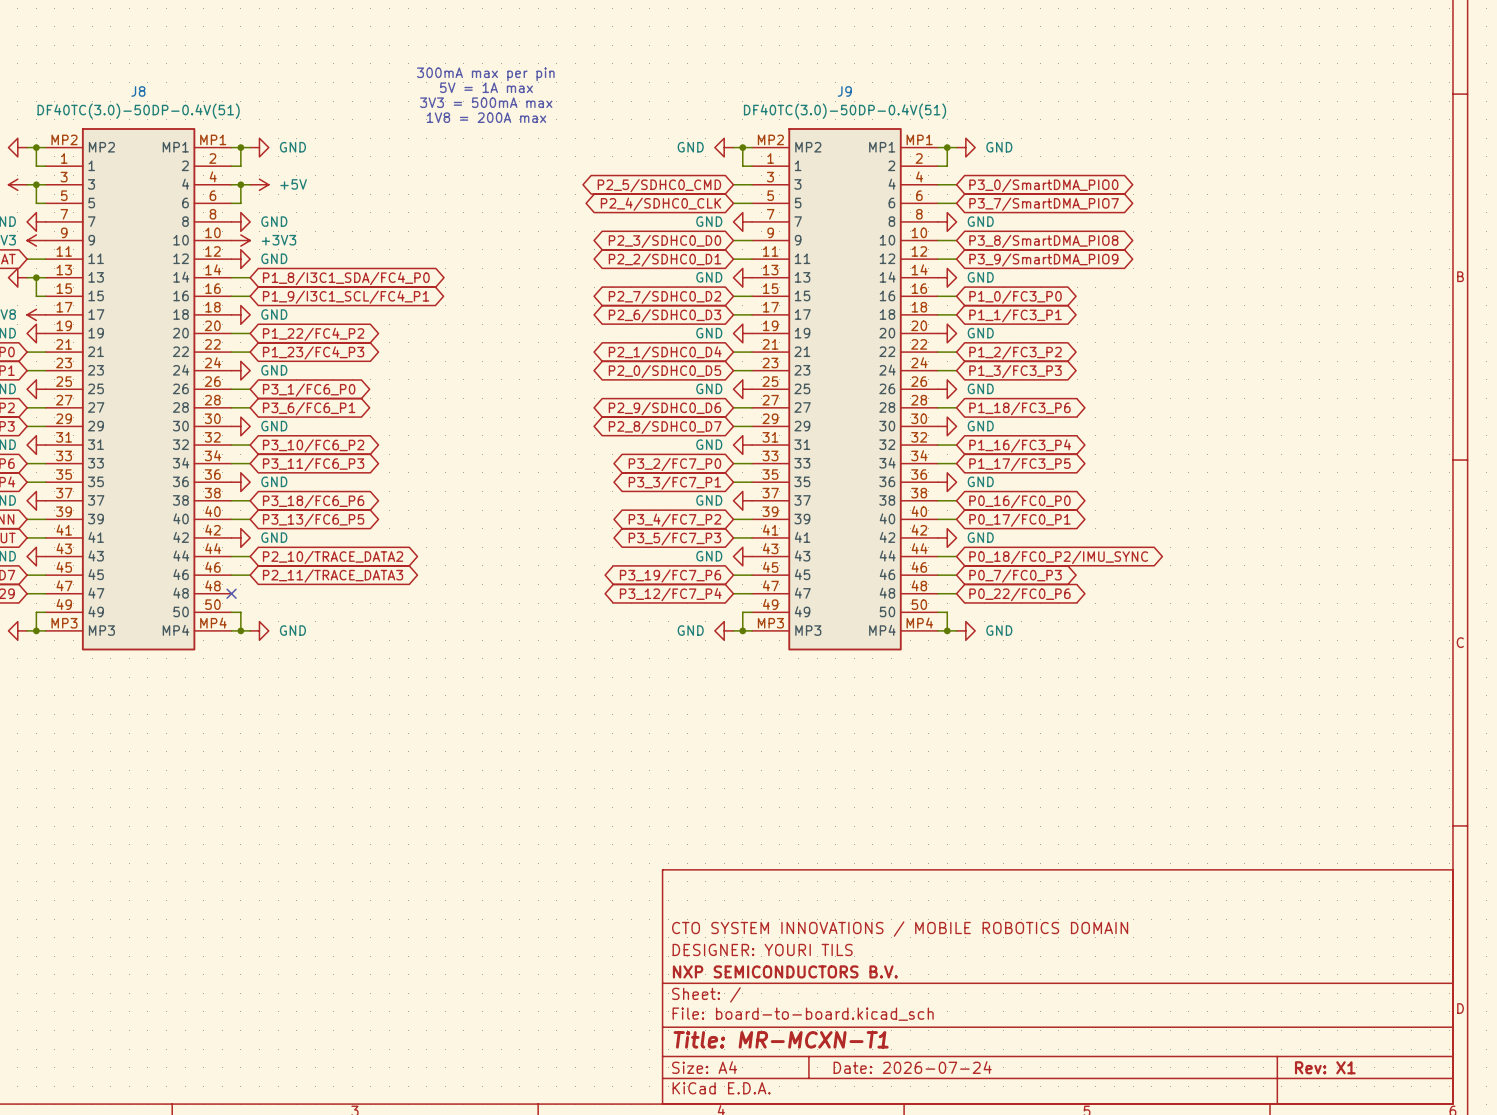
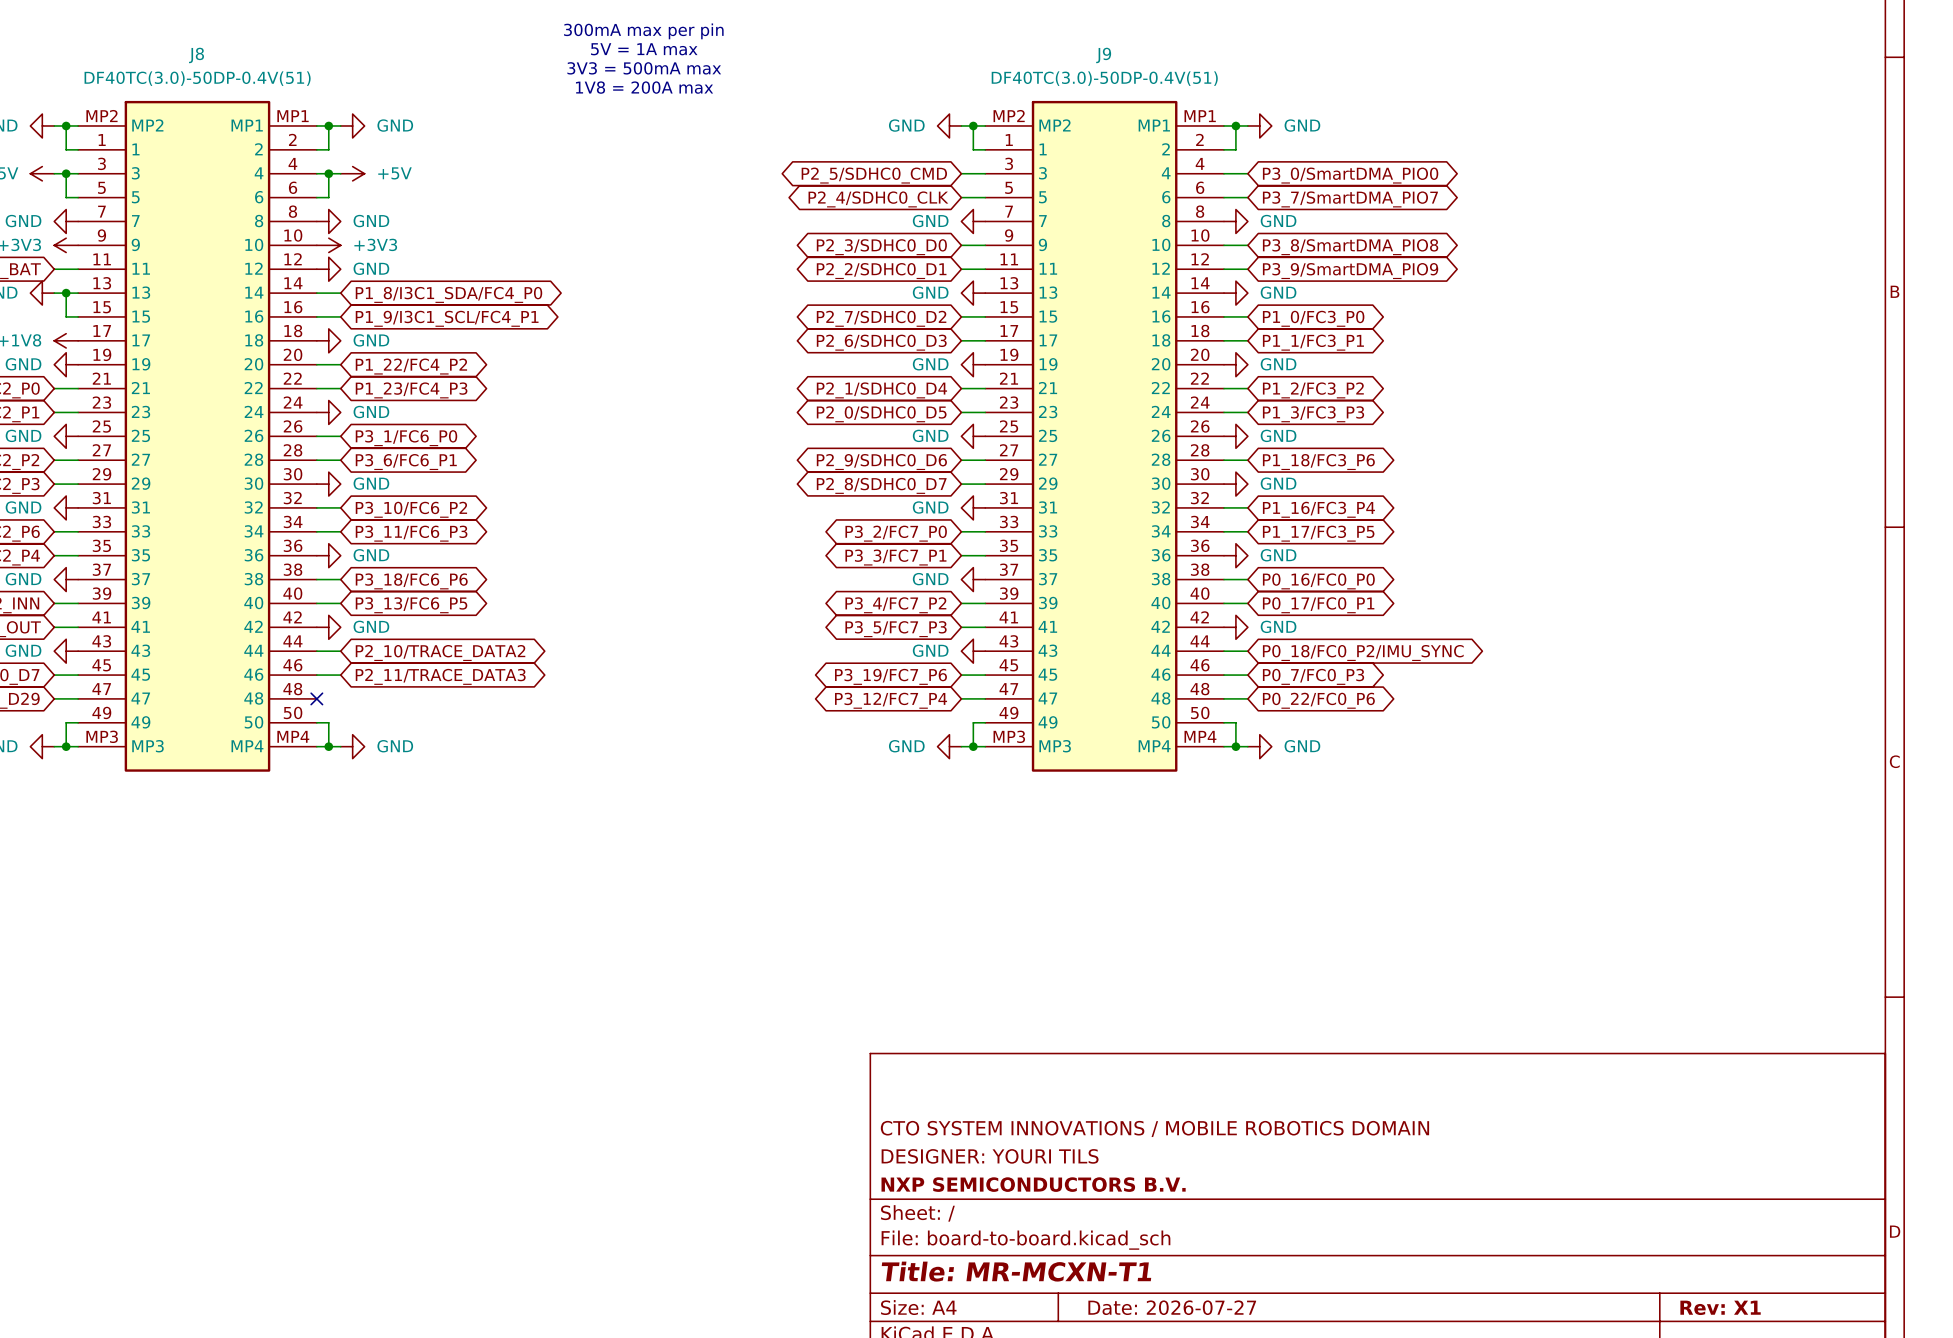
title block: Date: 2026-07-24 (912, 1067) -> Date: 2026-07-27 (1172, 1307)

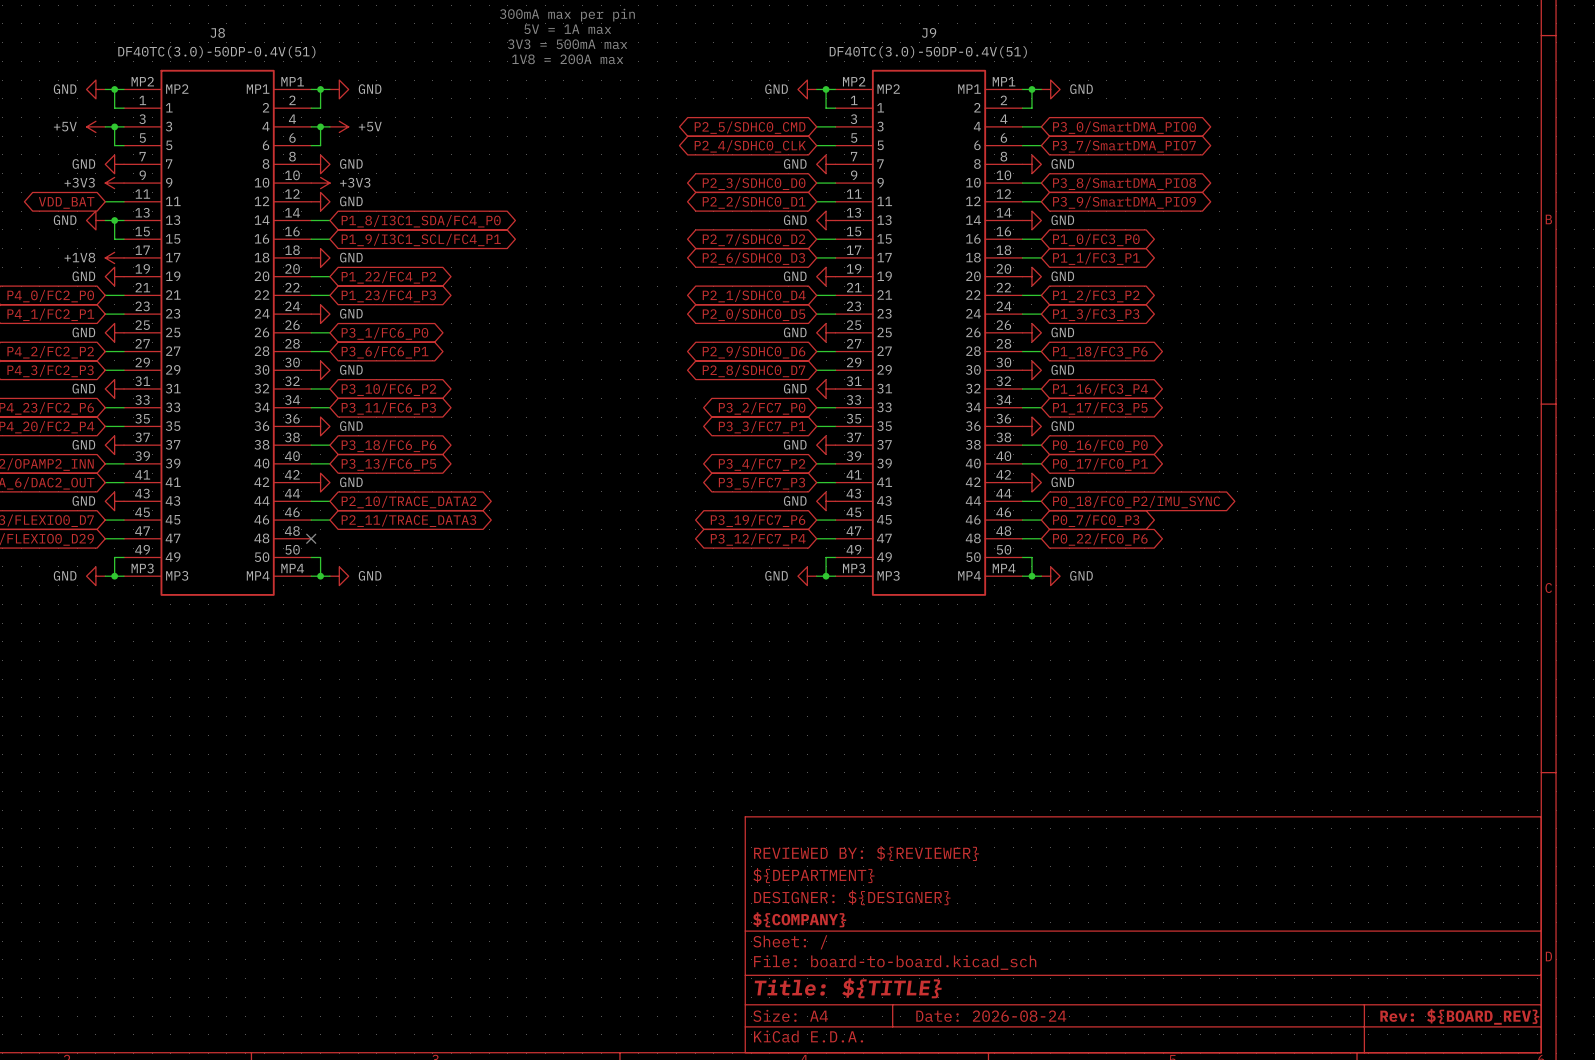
title block: none -> REVIEWED BY: ${REVIEWER} (866, 853)
title block: CTO SYSTEM INNOVATIONS / MOBILE ROBOTICS DOMAIN (1154, 1128) -> ${DEPARTMENT} (813, 875)
title block: DESIGNER: YOURI TILS (990, 1156) -> DESIGNER: ${DESIGNER} (852, 897)
title block: NXP SEMICONDUCTORS B.V. (1033, 1184) -> ${COMPANY} (799, 919)
title block: Title: MR-MCXN-T1 (1016, 1271) -> Title: ${TITLE} (848, 988)
title block: Date: 2026-07-27 (1172, 1307) -> Date: 2026-08-24 (991, 1016)
title block: Rev: X1 (1720, 1307) -> Rev: ${BOARD_REV} (1459, 1016)

